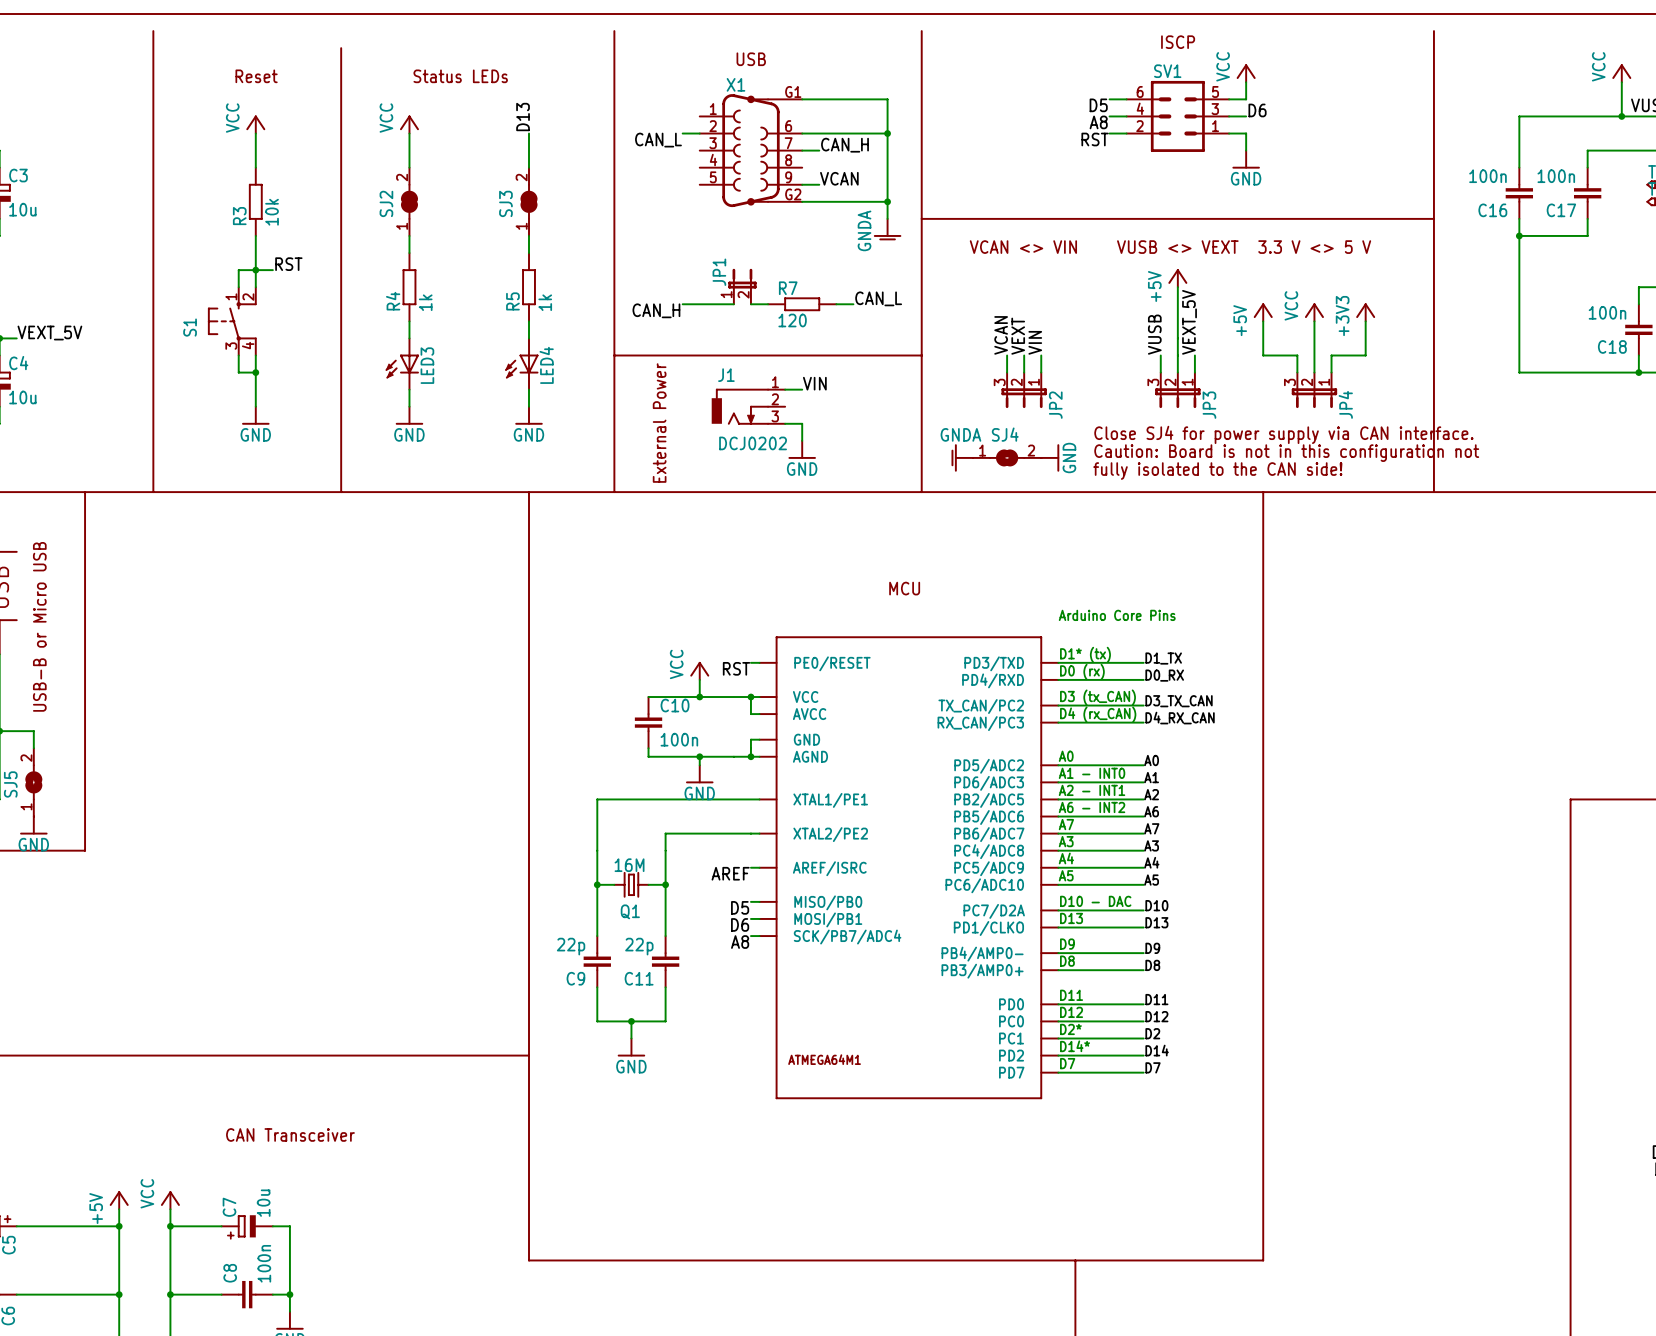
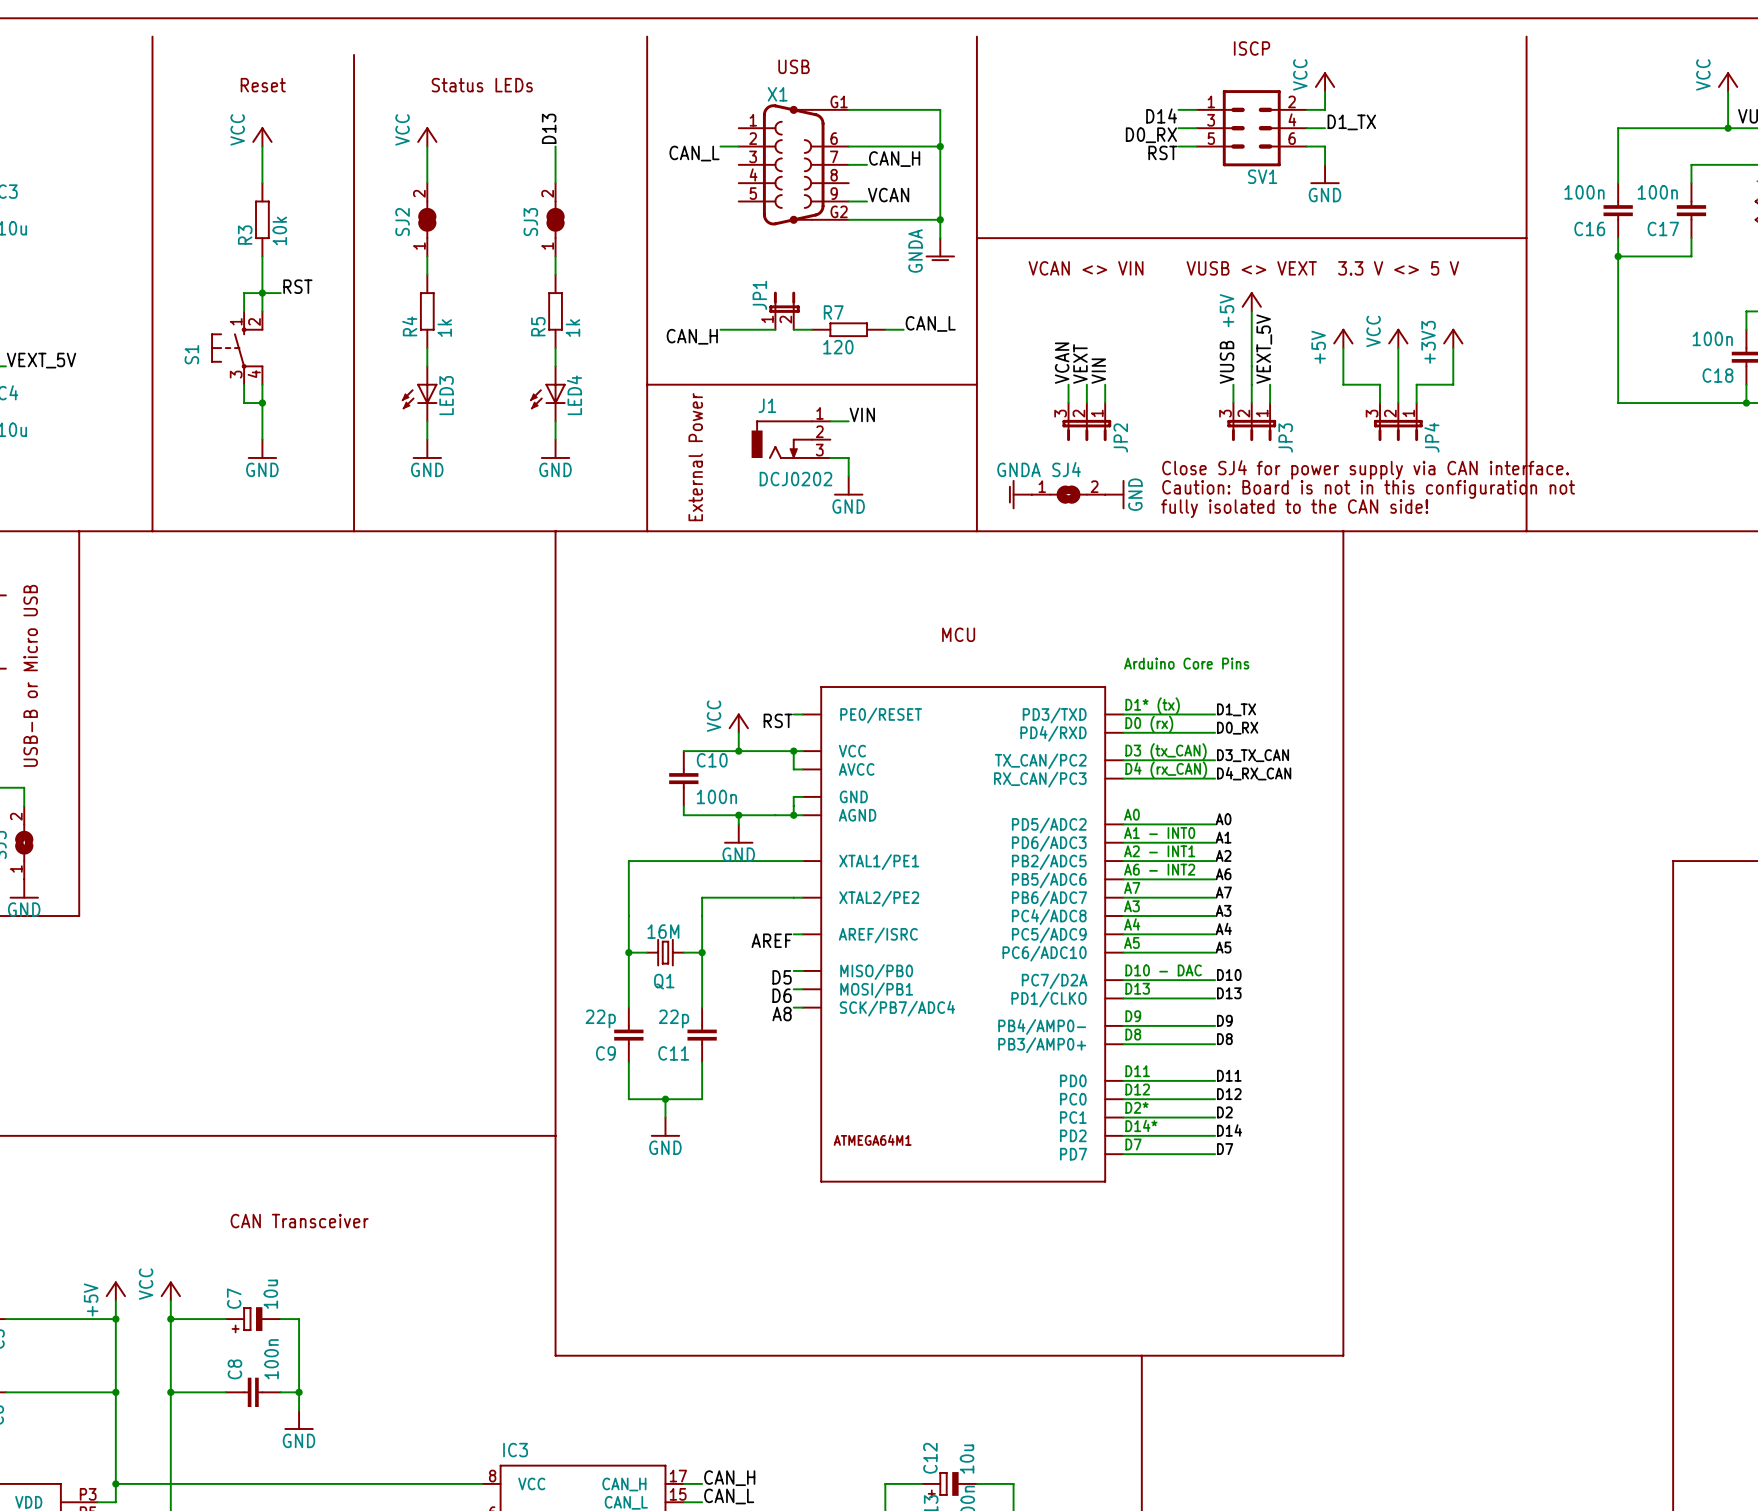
label: D5 (1098, 105) -> D14 (1161, 115)
label: D6 (1257, 110) -> D1_TX (1351, 122)
SV1 rotation: 0° (1177, 116) -> 180° (1251, 128)
label: A8 (1098, 122) -> D0_RX (1151, 135)

